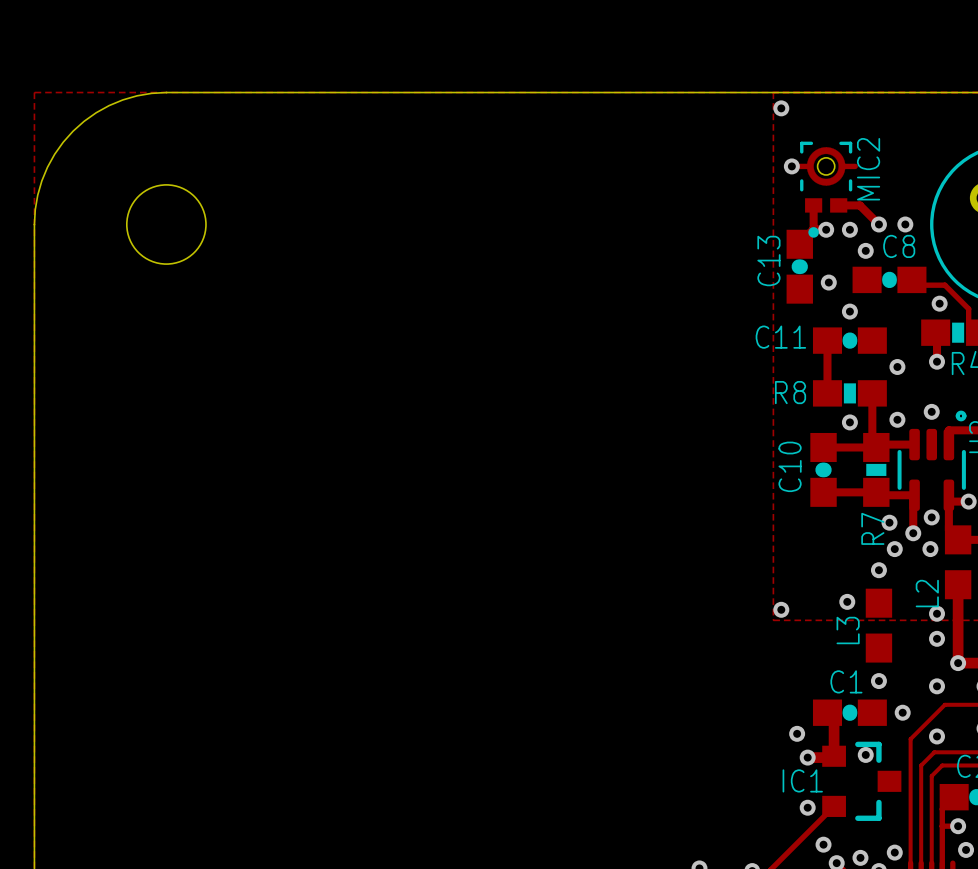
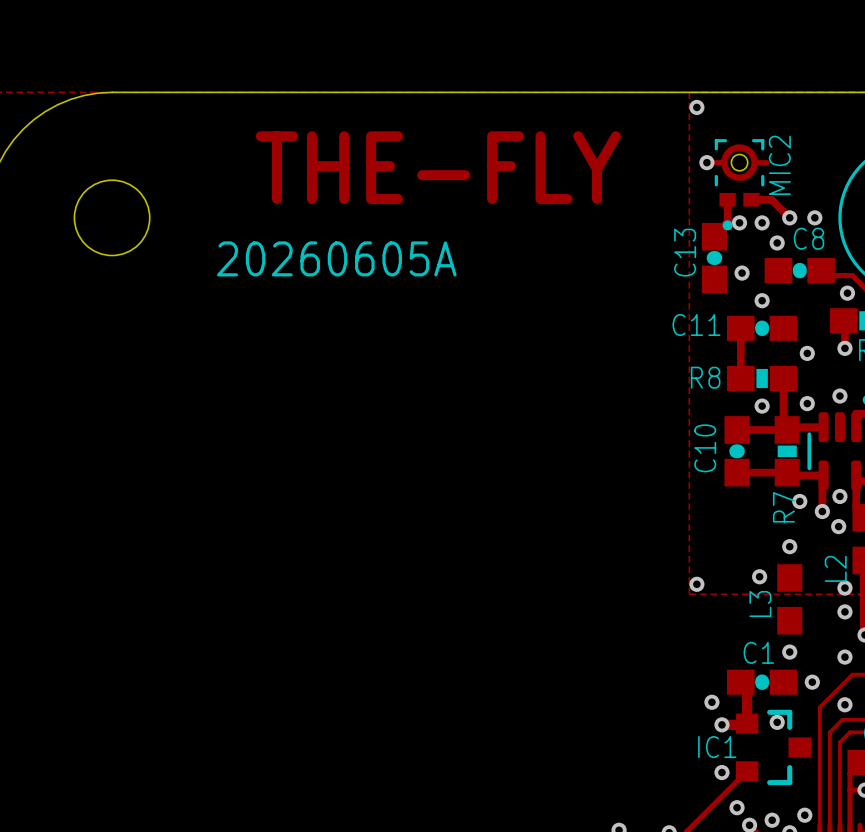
drawing: none -> [255, 131, 621, 205]
text: none -> 20260605A (336, 258)
via: (894, 549) -> none

